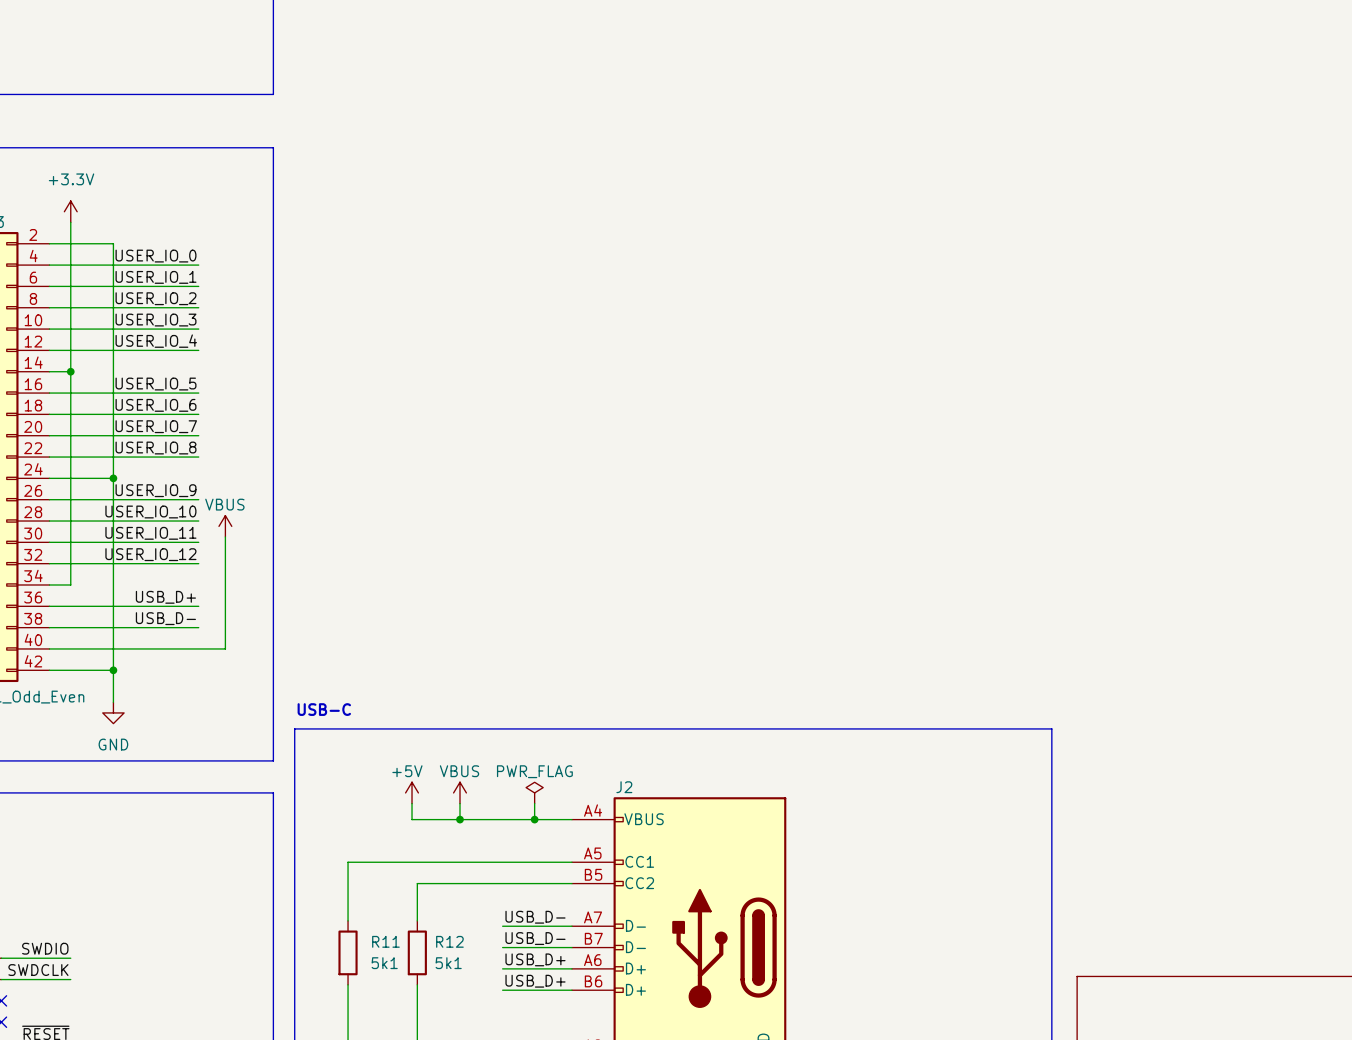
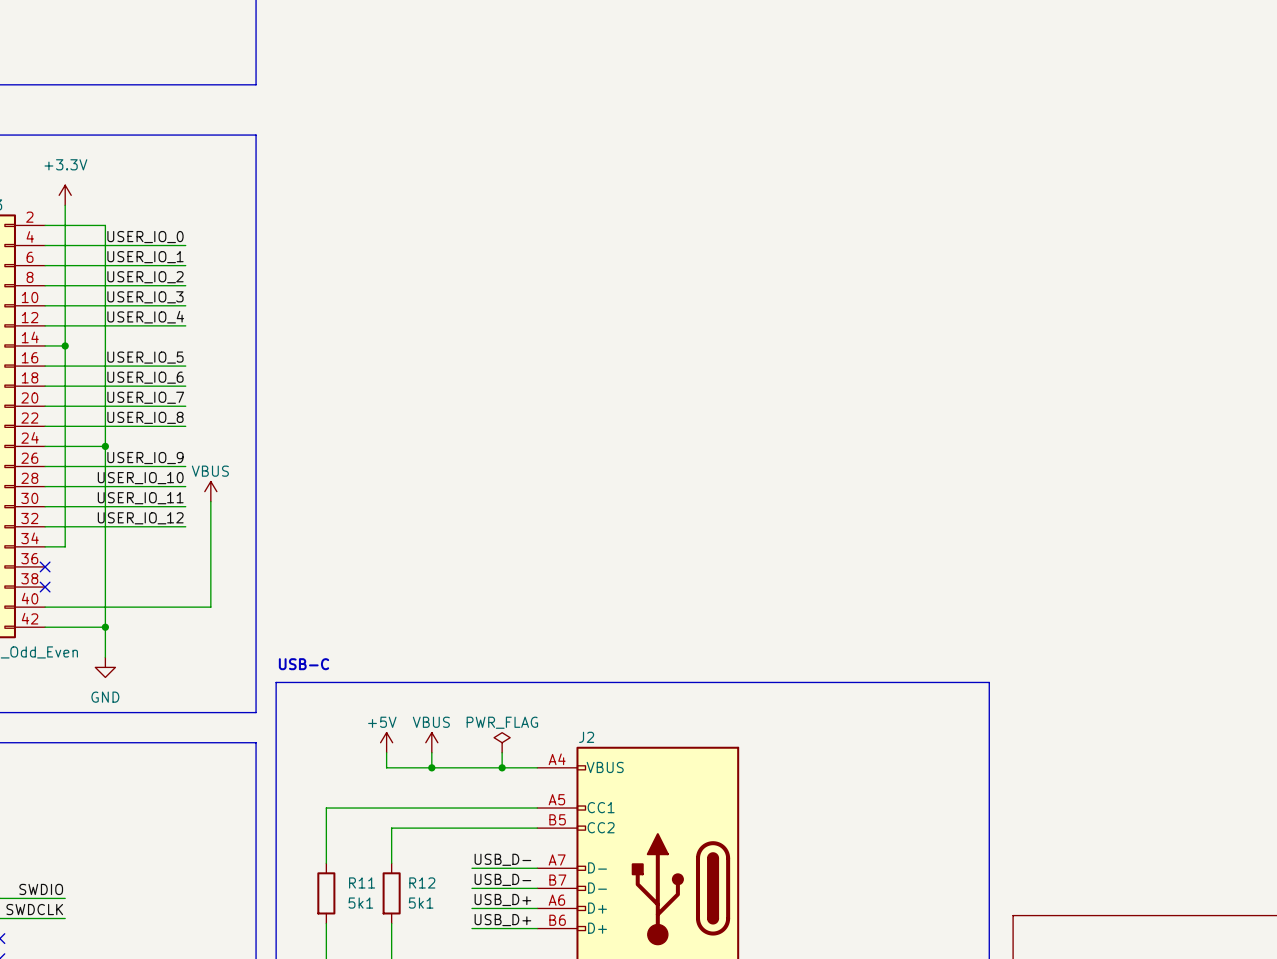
label: USB_D+ (165, 597) -> none
wire: (49, 606) (198, 606) -> none
no-connect mark: none -> (45, 566)
label: USB_D- (165, 618) -> none
wire: (49, 627) (198, 627) -> none
no-connect mark: none -> (45, 587)

